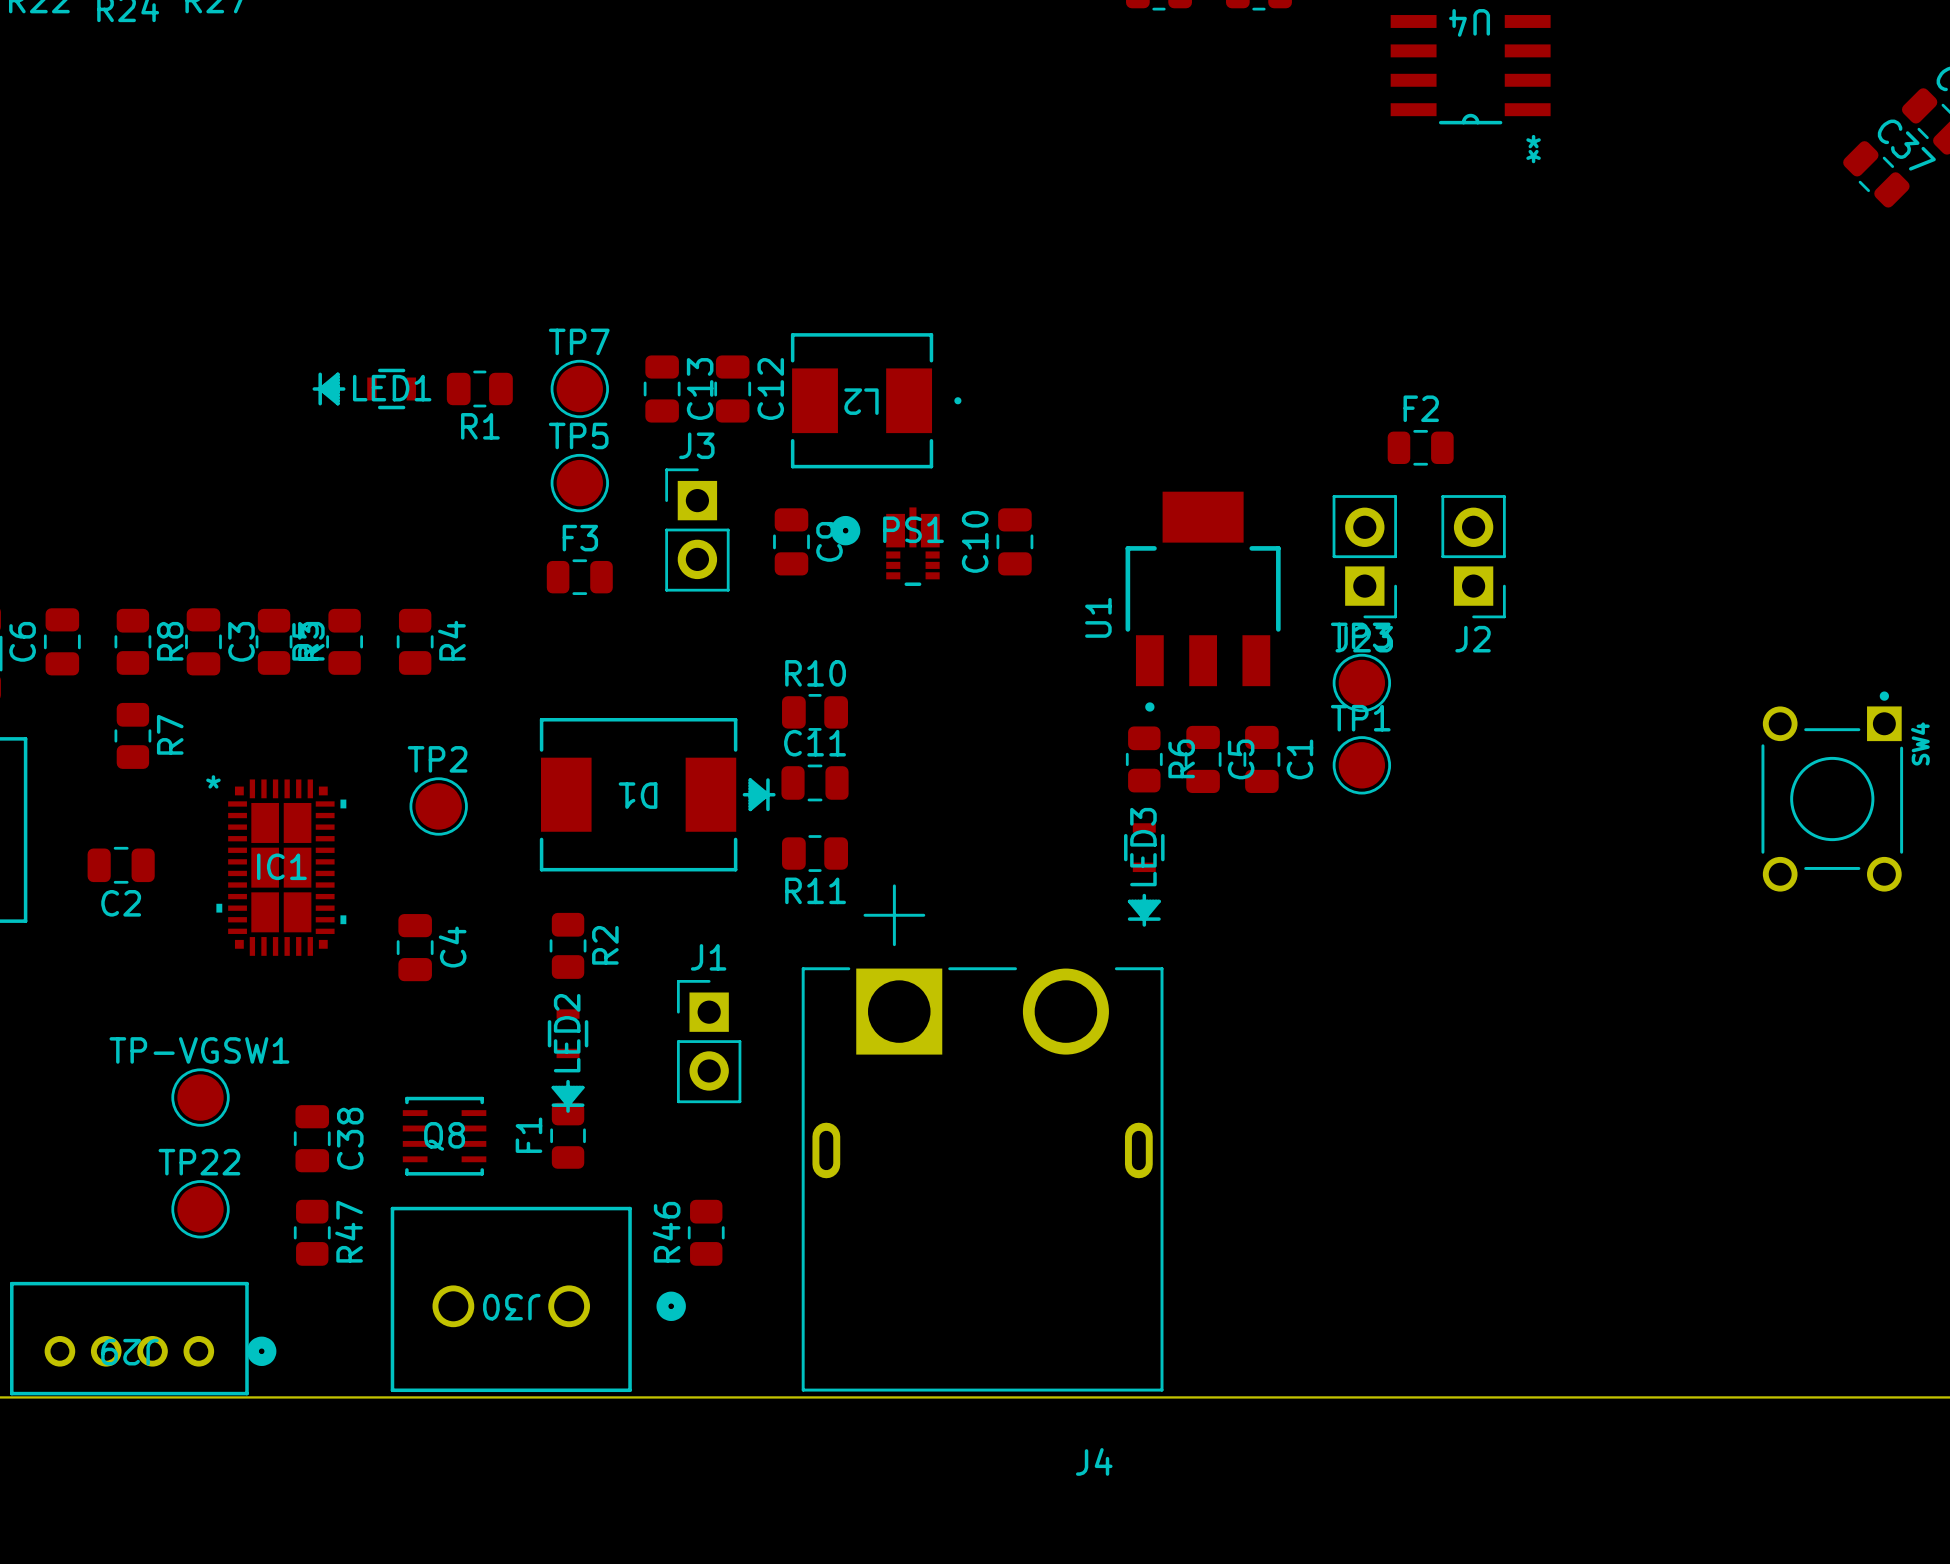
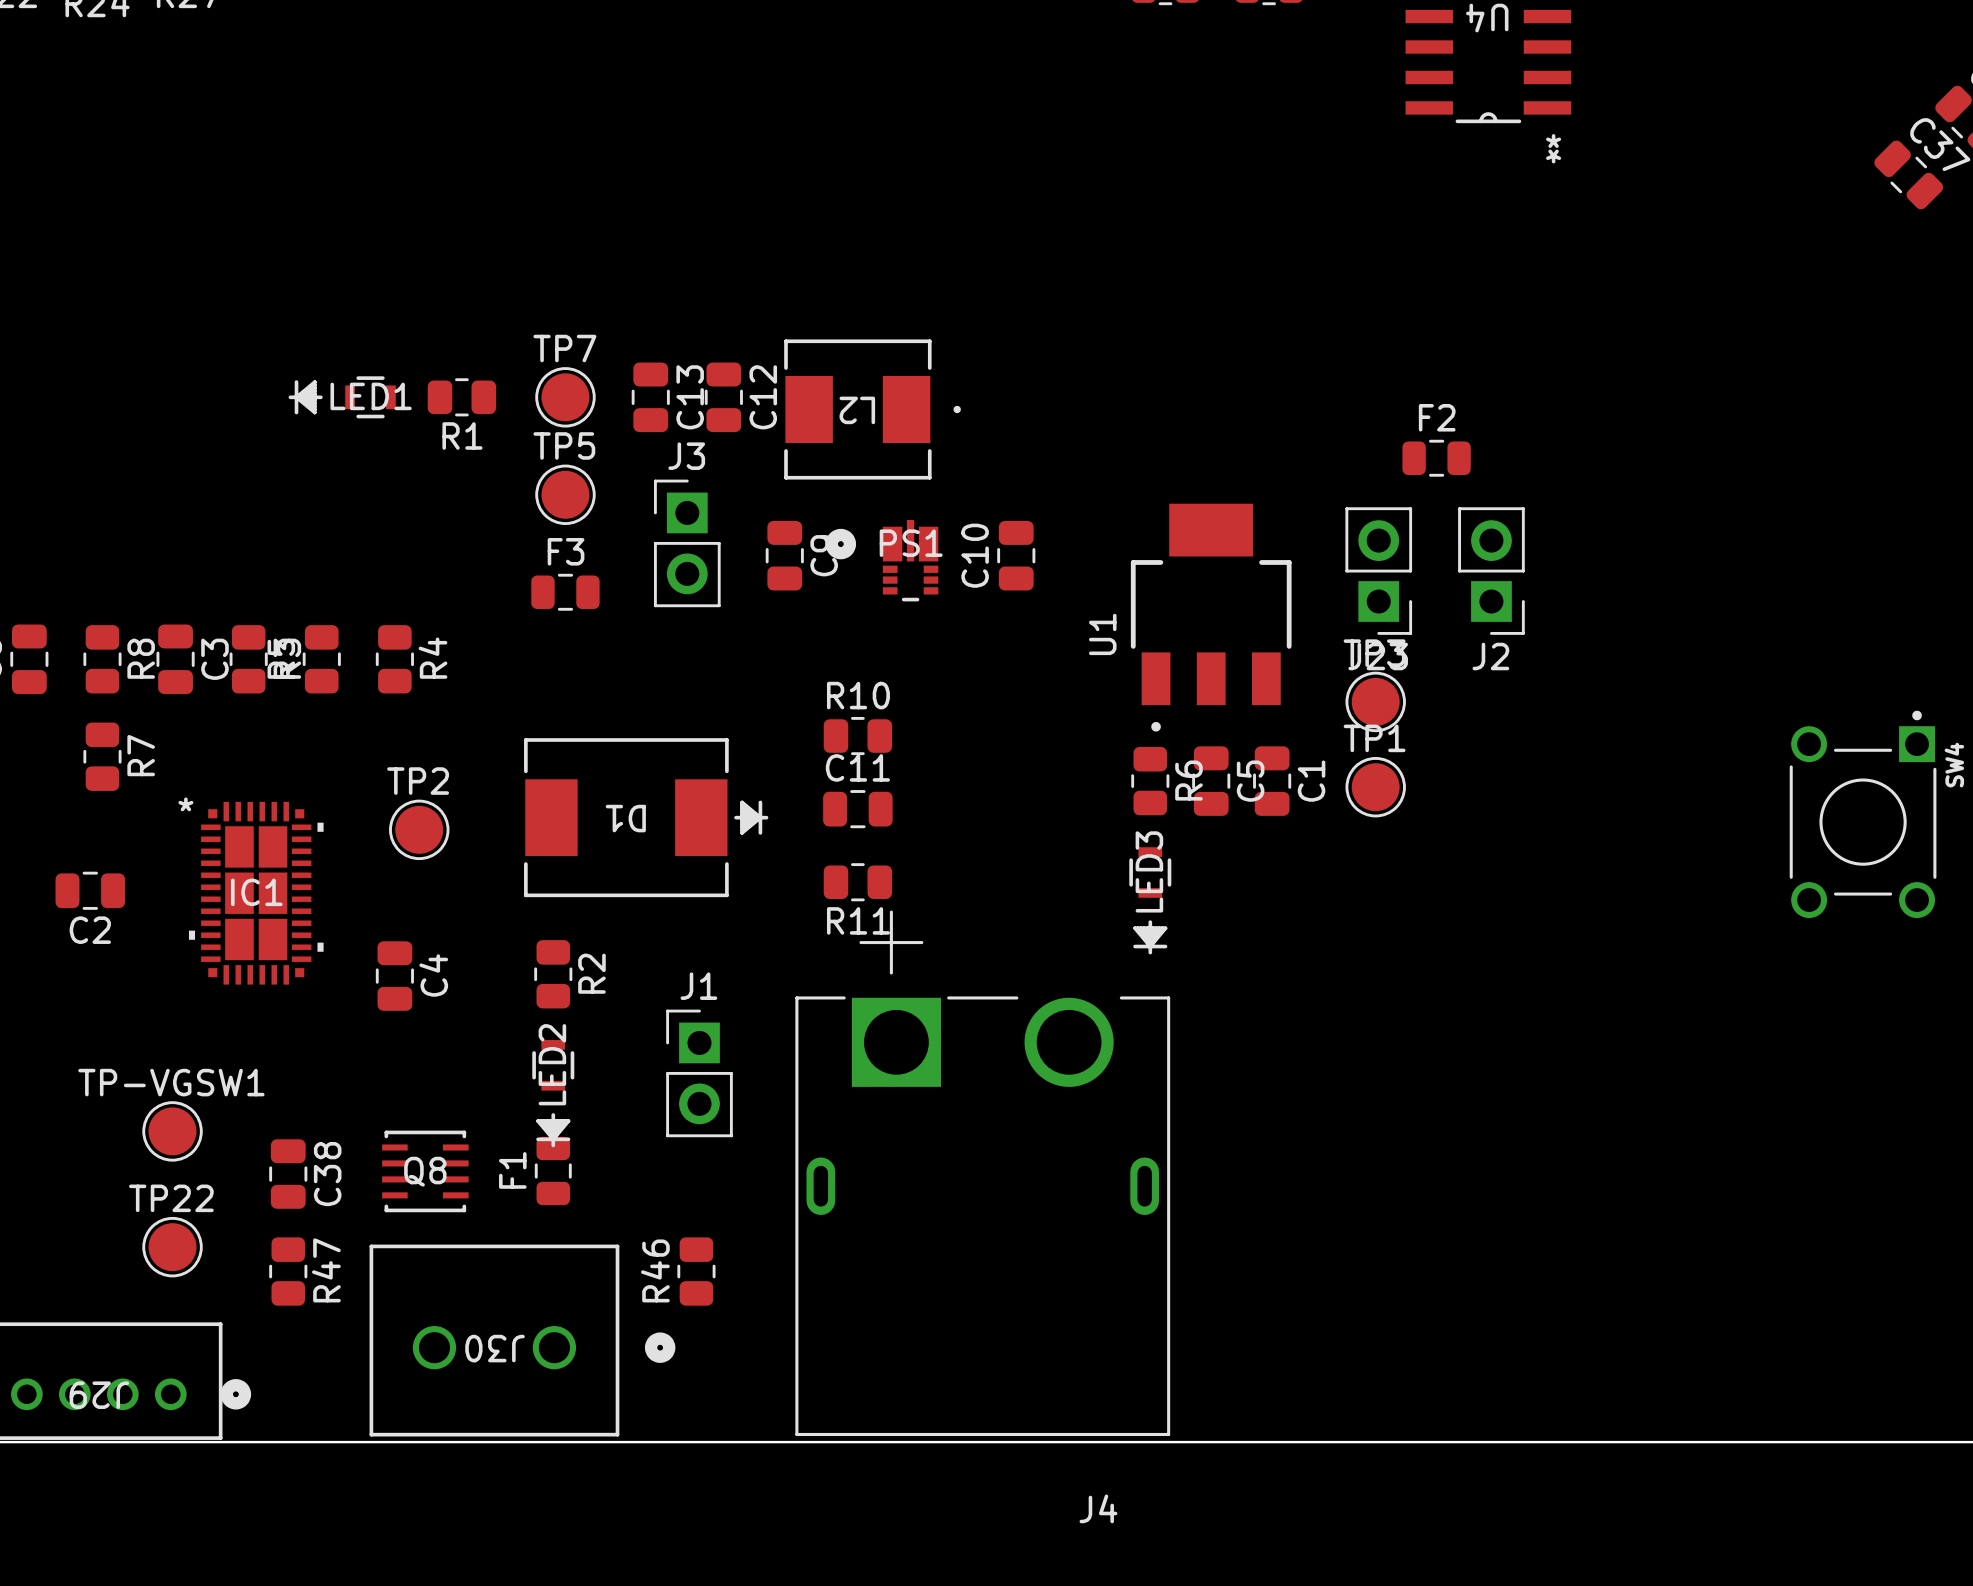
R10 position: (815, 712) -> (857, 736)
C11 position: (815, 782) -> (857, 809)
R11 position: (815, 853) -> (857, 882)

